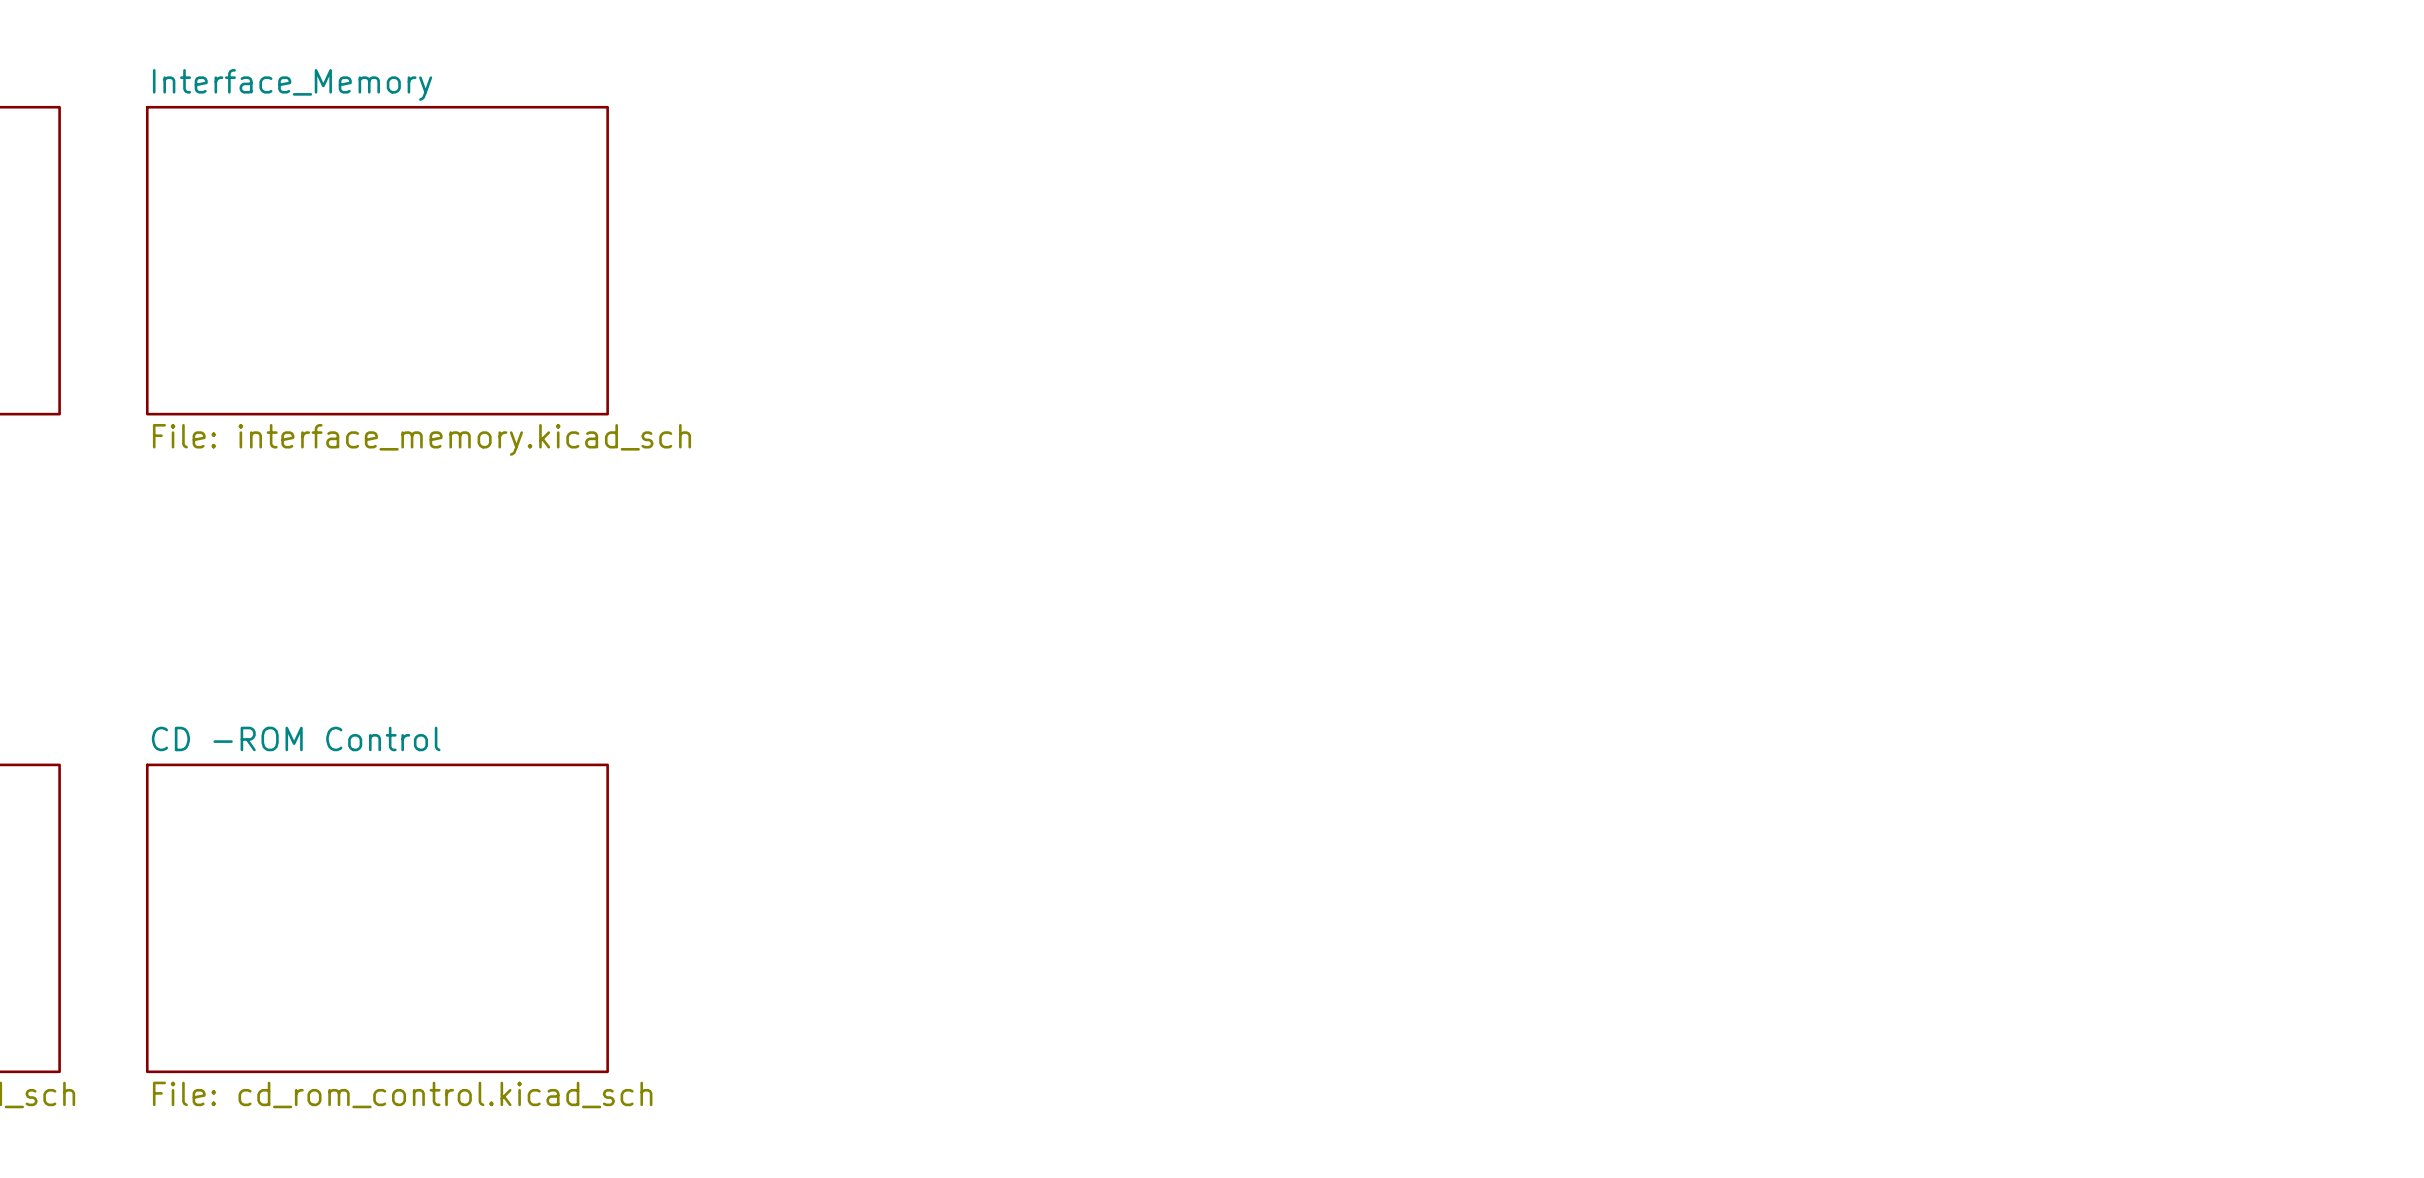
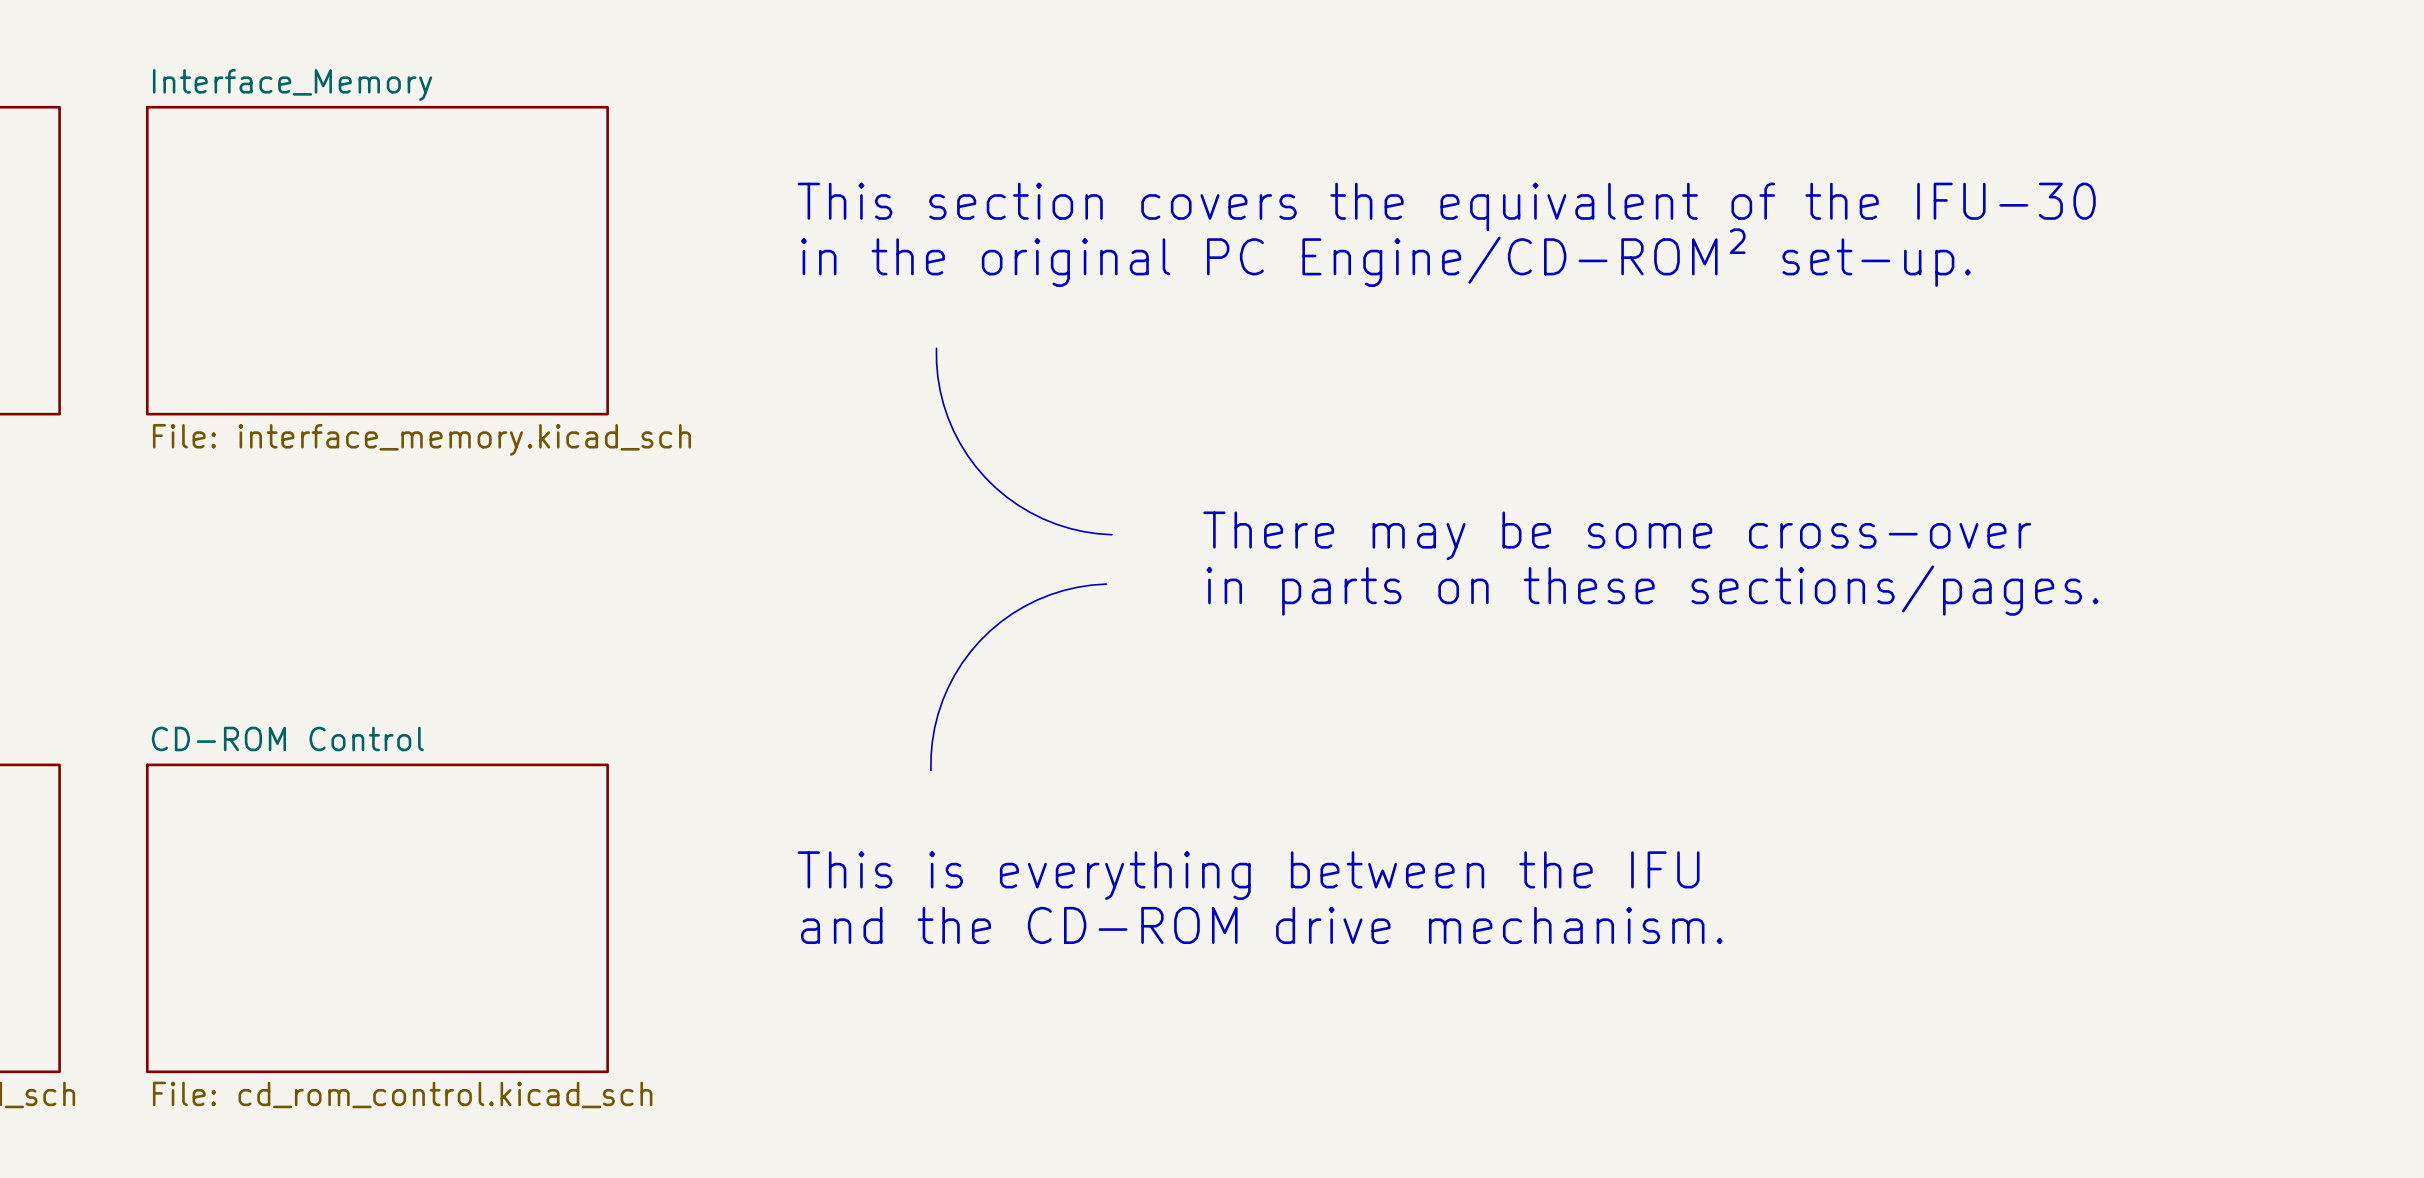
text: none -> This section covers the equivalent of the IFU-30 (1446, 206)
text: none -> in the original PC Engine/CD-ROM² set-up. (1385, 257)
line: none -> (936, 348) (937, 376) (948, 418) (967, 455) (985, 477) (1018, 505) (1043, 518) (1069, 528) (1111, 534)
text: none -> There may be some cross-over (1617, 535)
line: none -> (1106, 584) (1064, 590) (1037, 599) (1001, 621) (980, 640) (954, 675) (942, 700) (932, 742) (930, 770)
text: none -> in parts on these sections/pages. (1652, 590)
sheet CD -ROM Control name: CD -ROM Control (296, 738) -> CD-ROM Control (287, 738)
text: none -> This is everything between the IFU (1248, 875)
text: none -> and the CD-ROM drive mechanism. (1261, 925)

